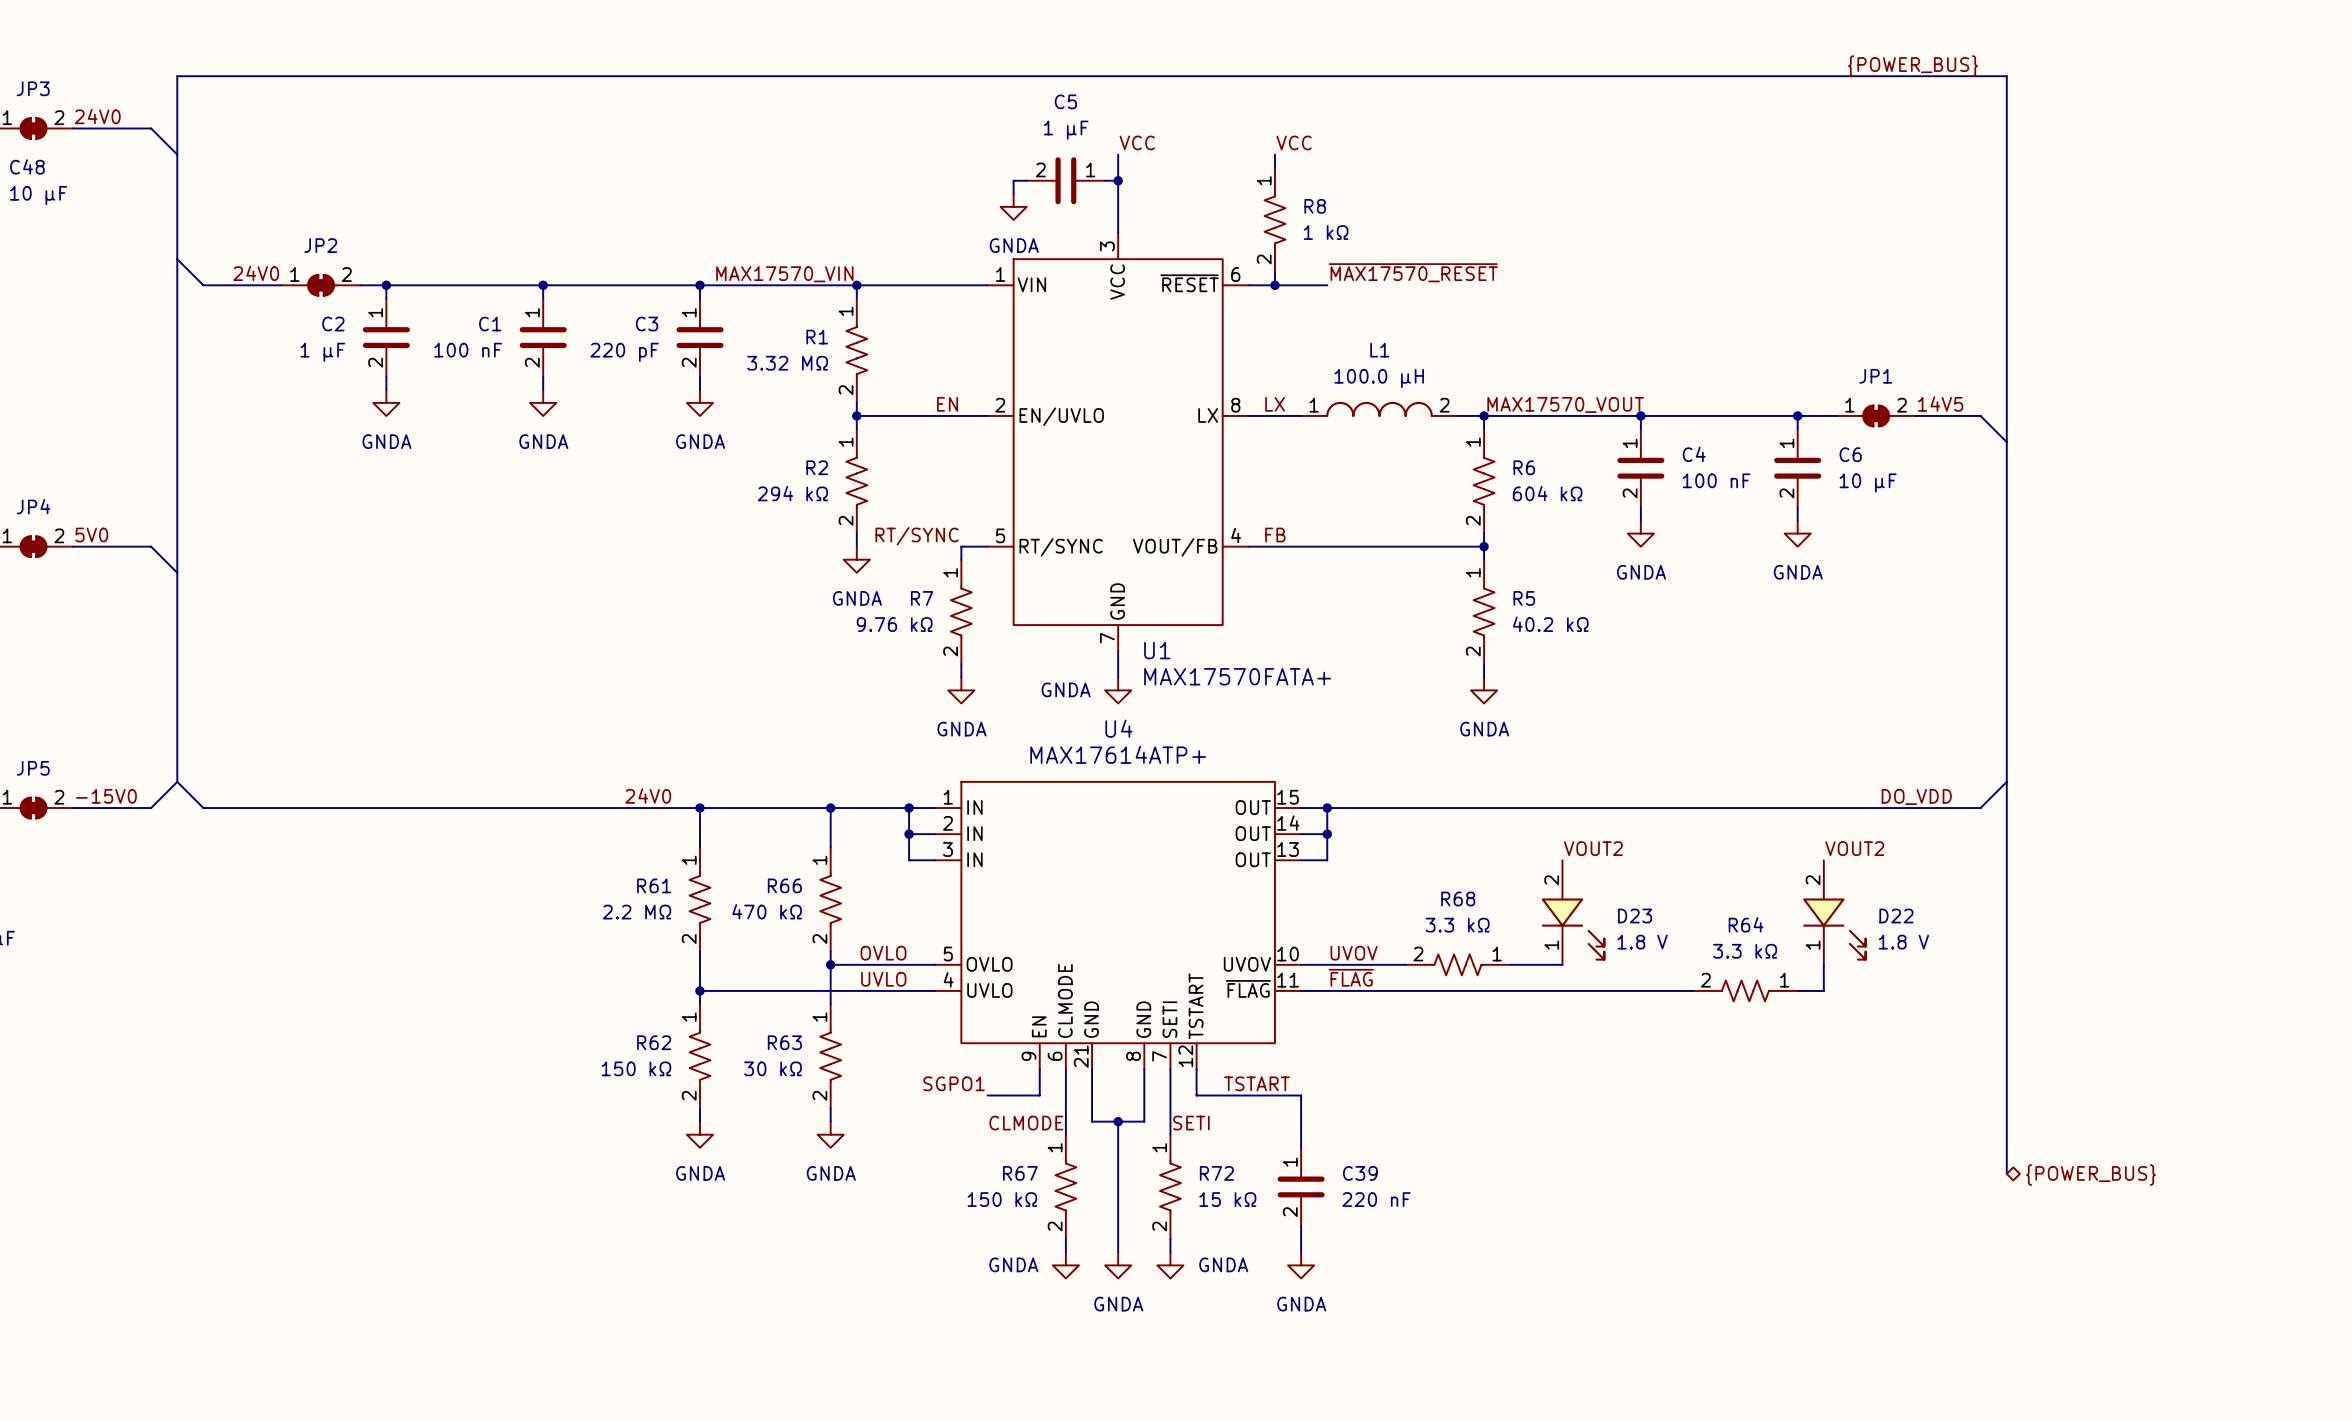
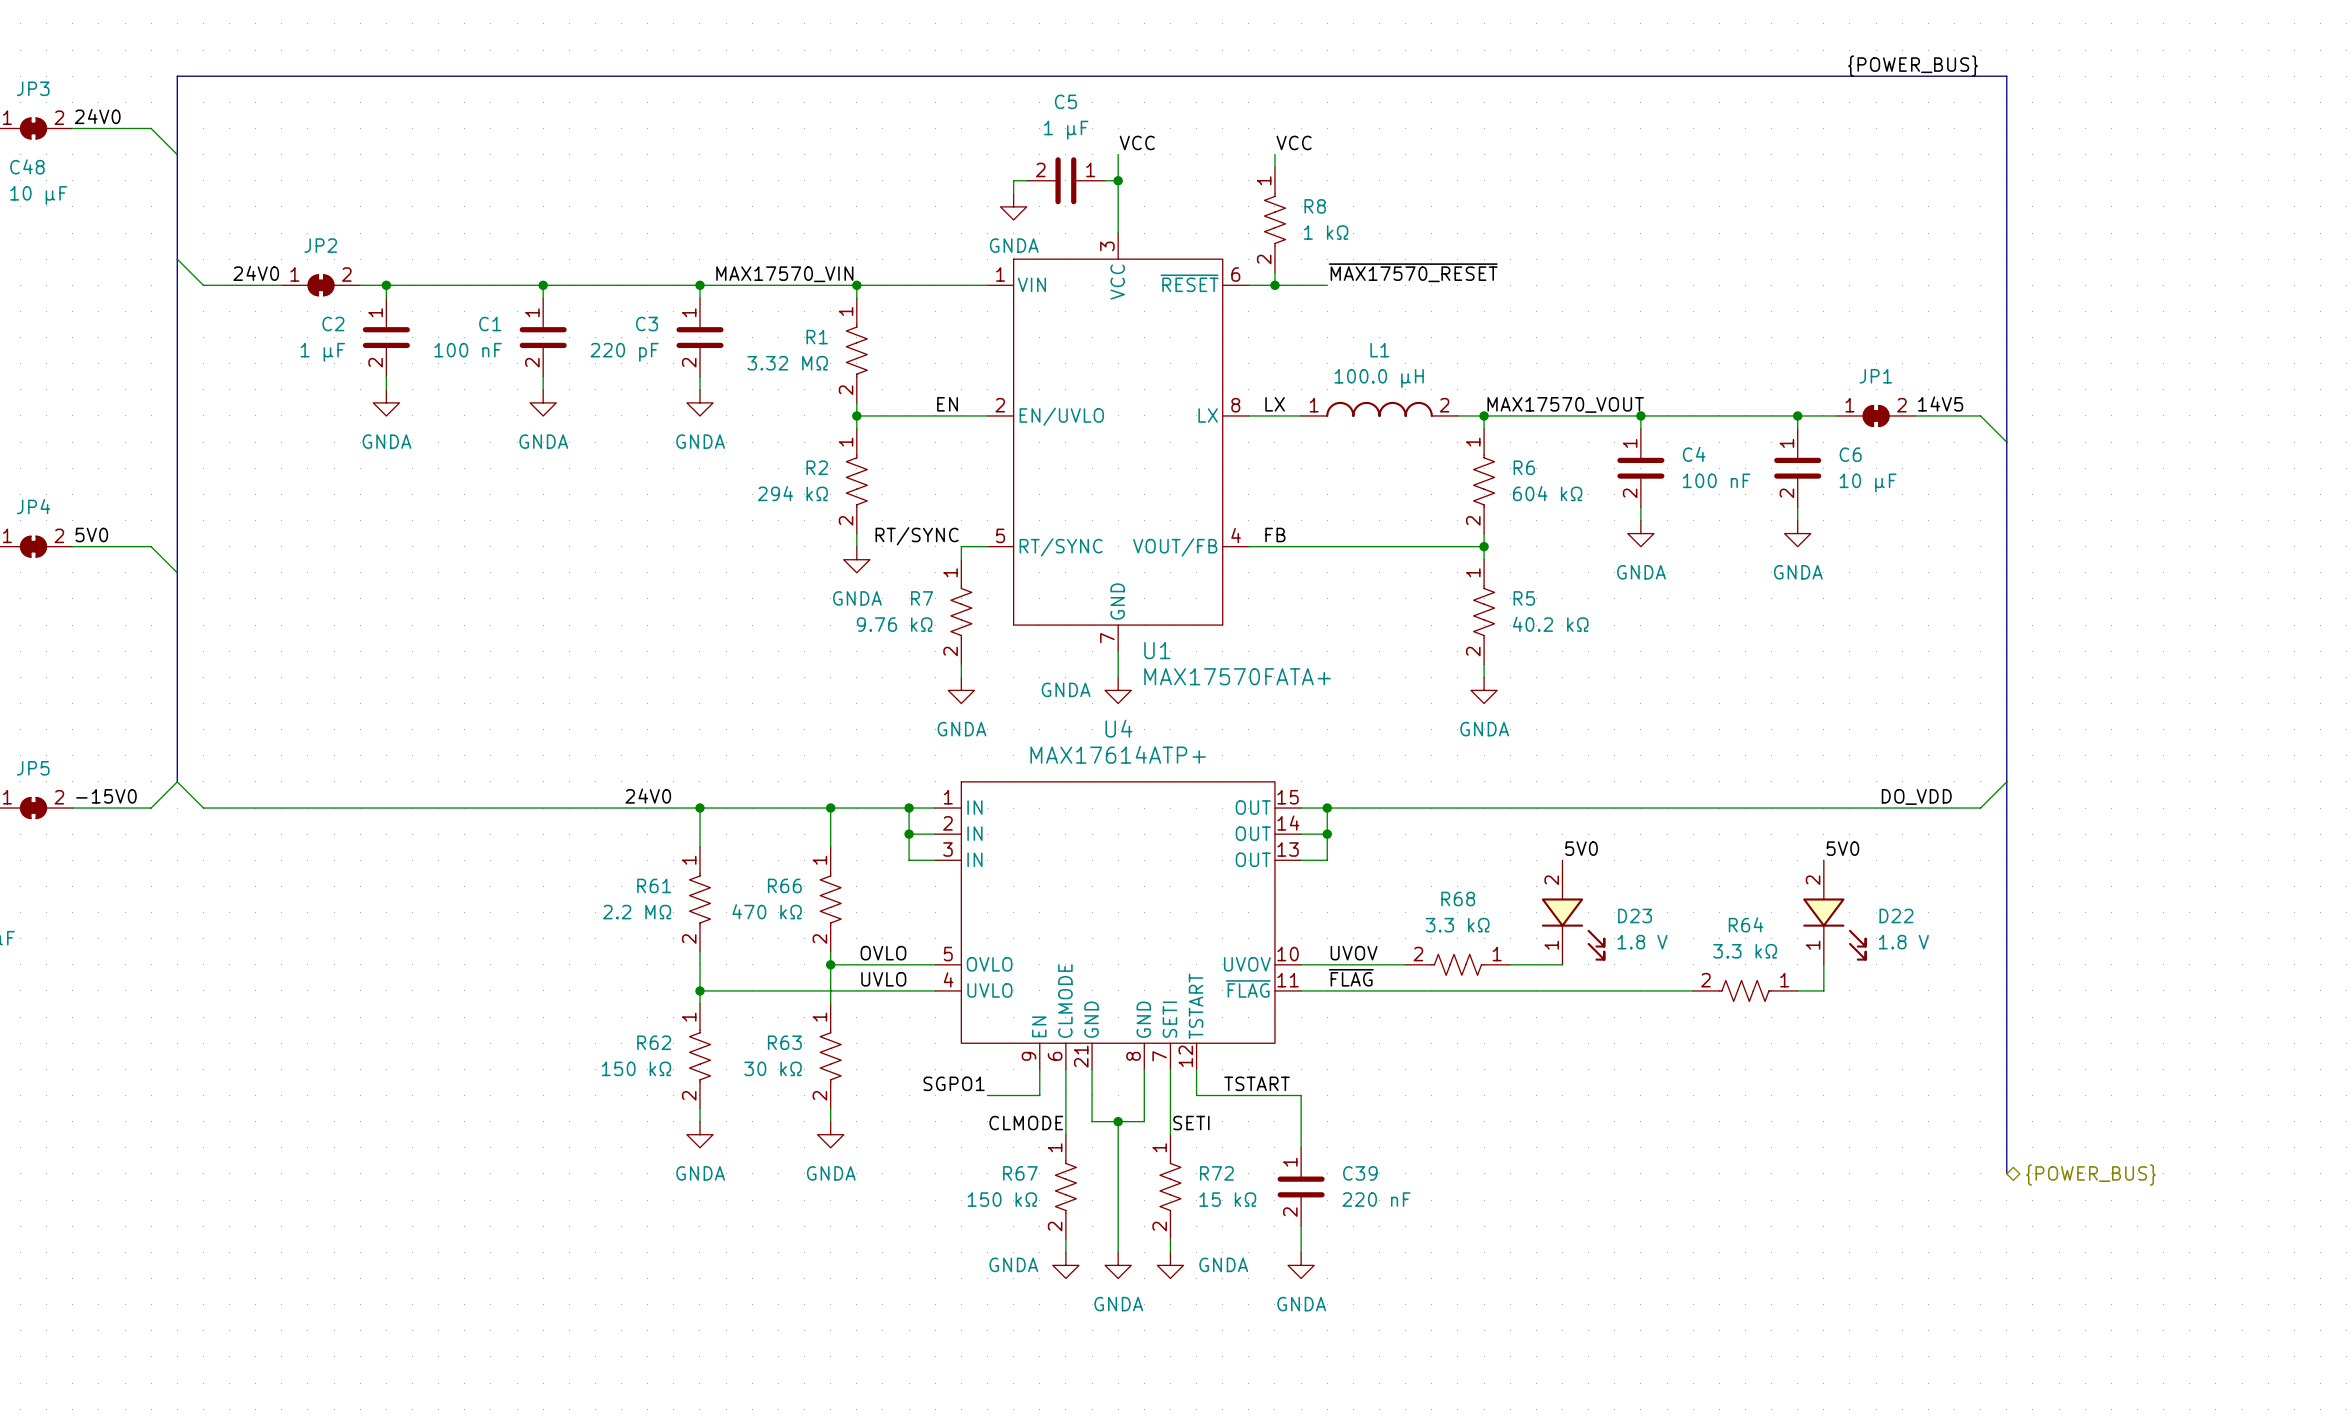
label: VOUT2 (1593, 848) -> 5V0 (1581, 848)
label: VOUT2 (1854, 848) -> 5V0 (1842, 848)

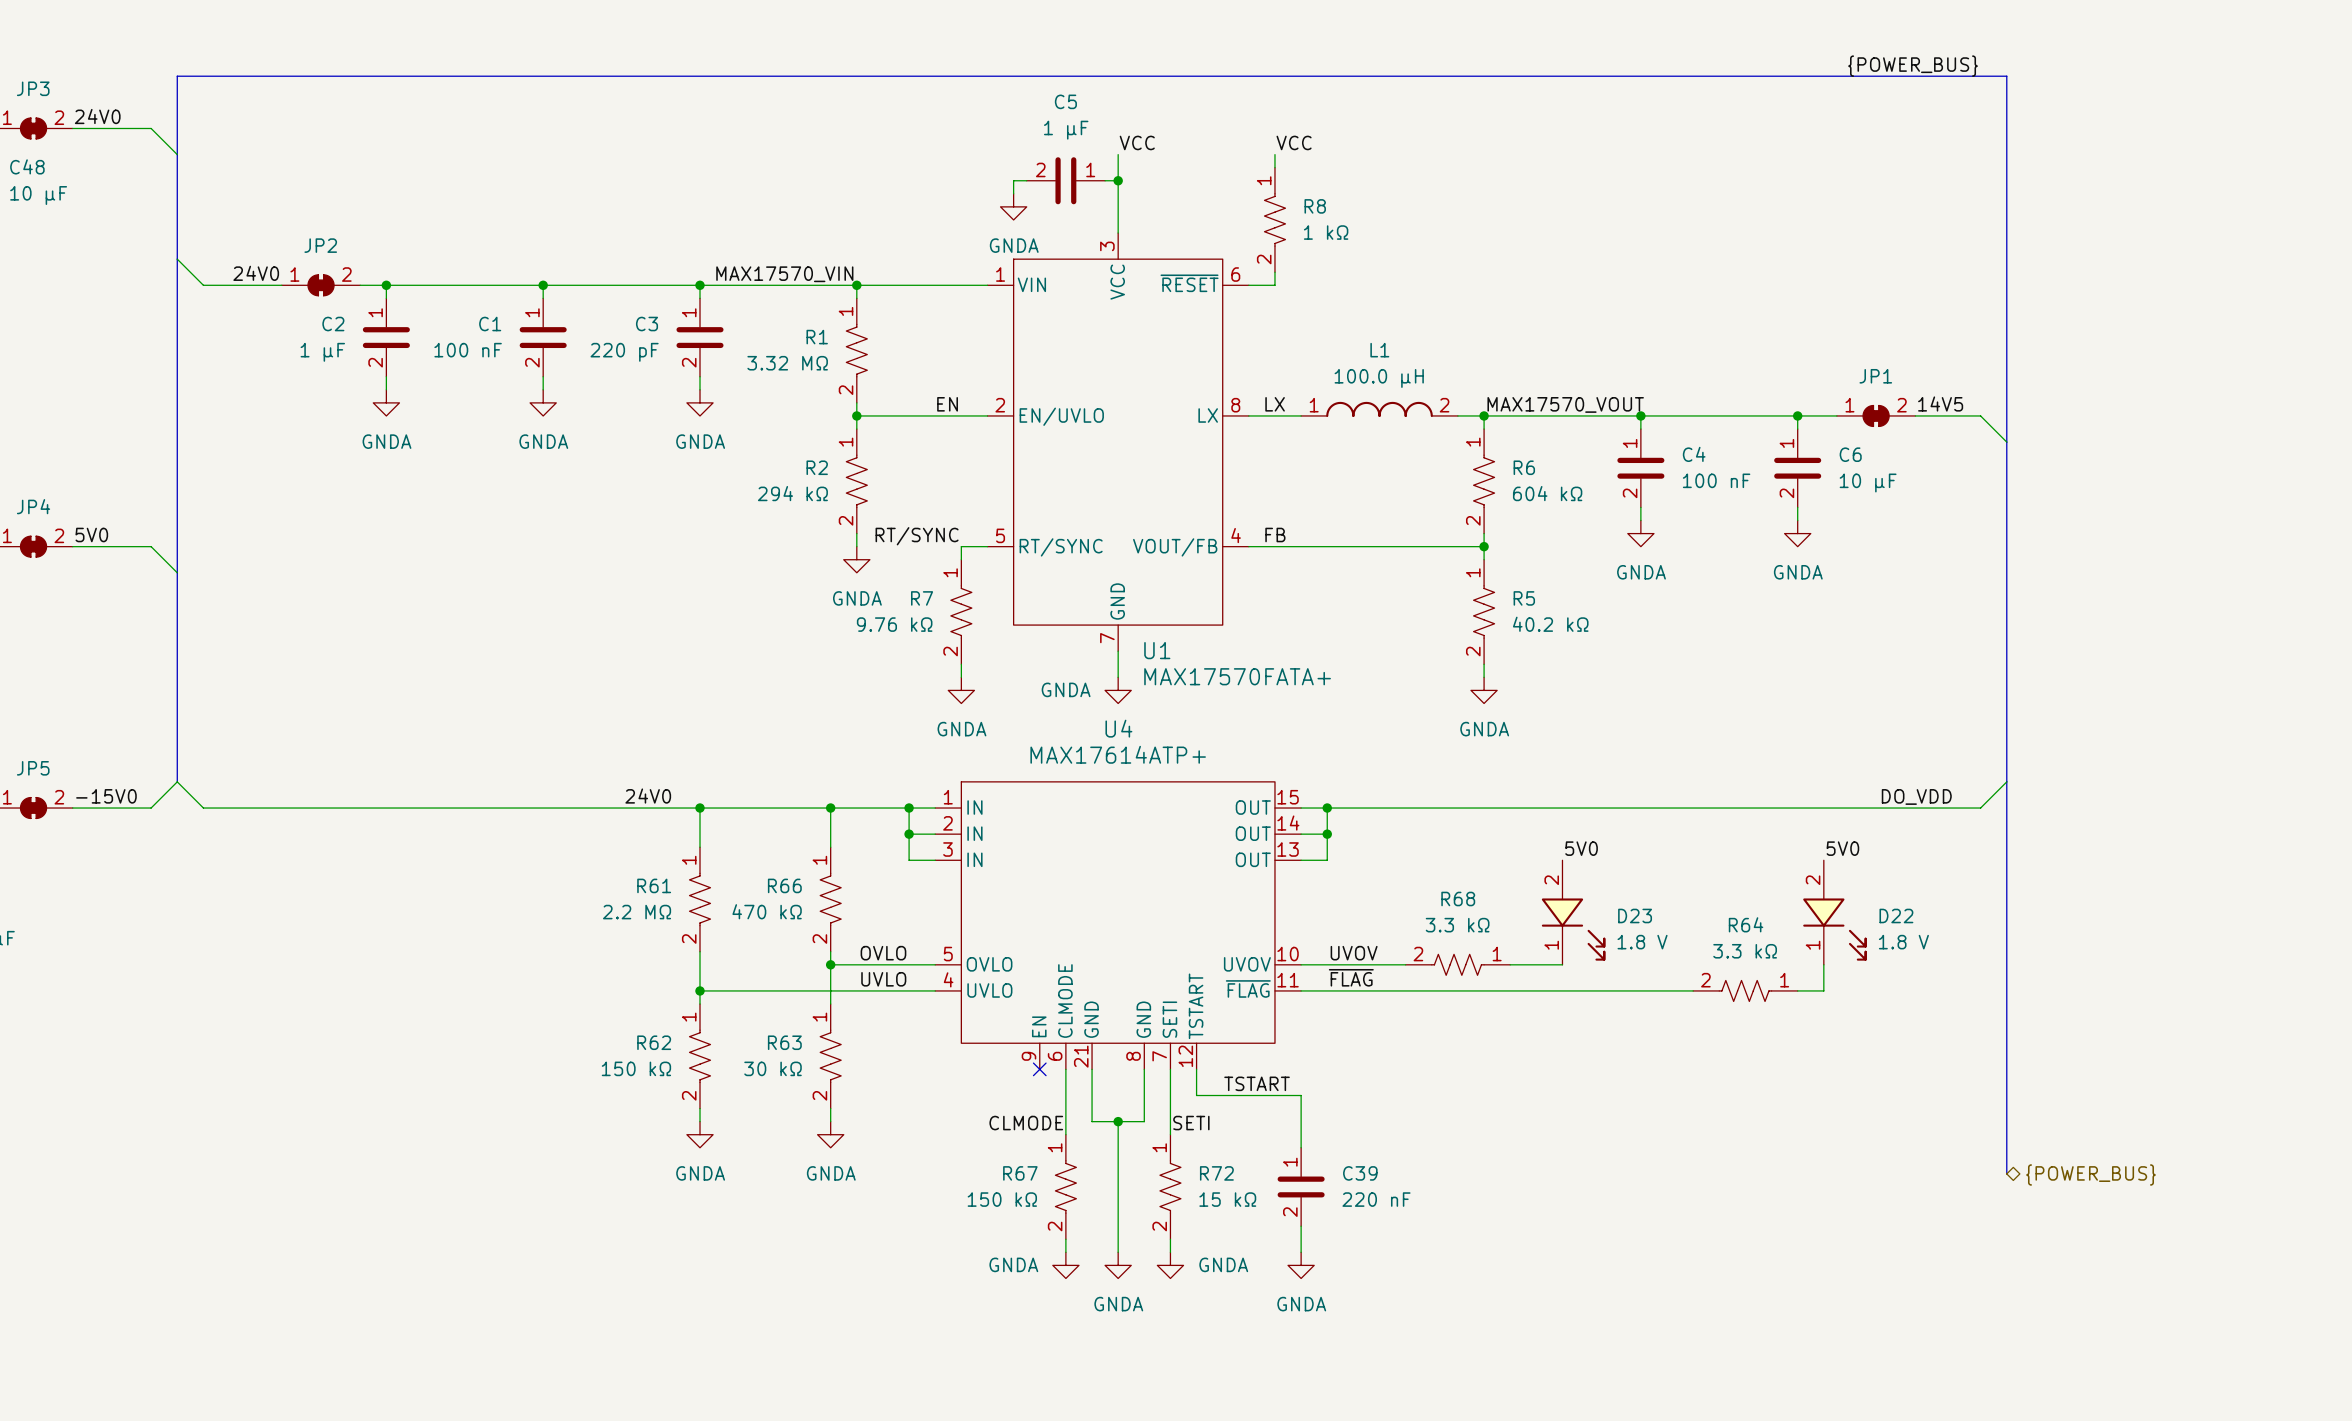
label: ~{MAX17570_RESET} (1413, 272) -> none
wire: (1274, 285) (1327, 285) -> none
junction: (1274, 285) -> none
wire: (1039, 1069) (1039, 1095) (987, 1095) -> none
no-connect mark: none -> (1039, 1069)
label: SGPO1 (954, 1083) -> none

